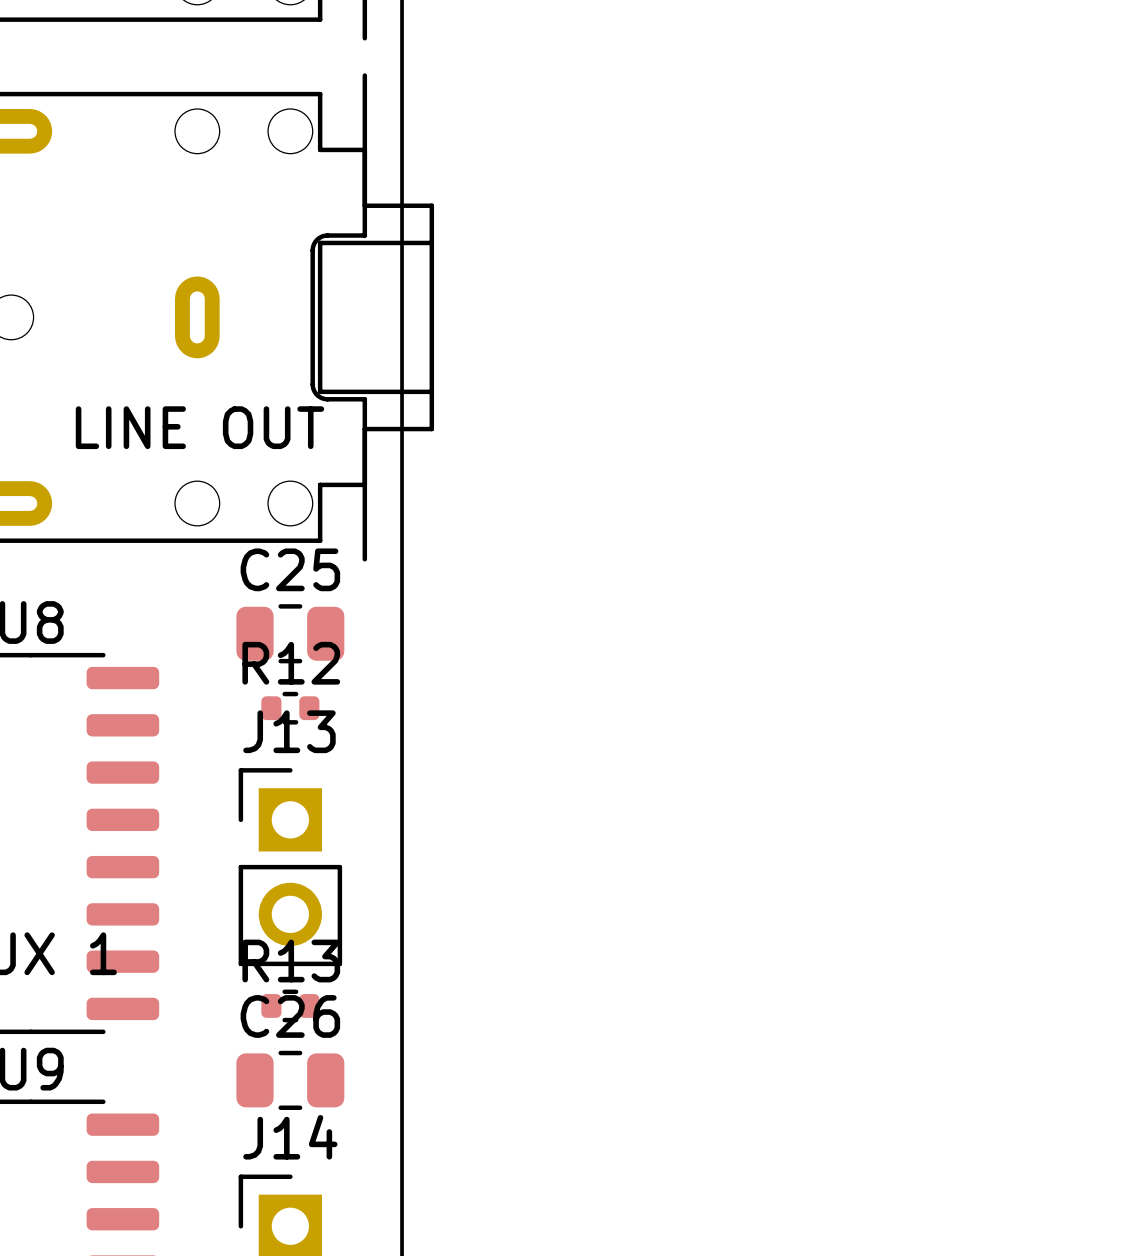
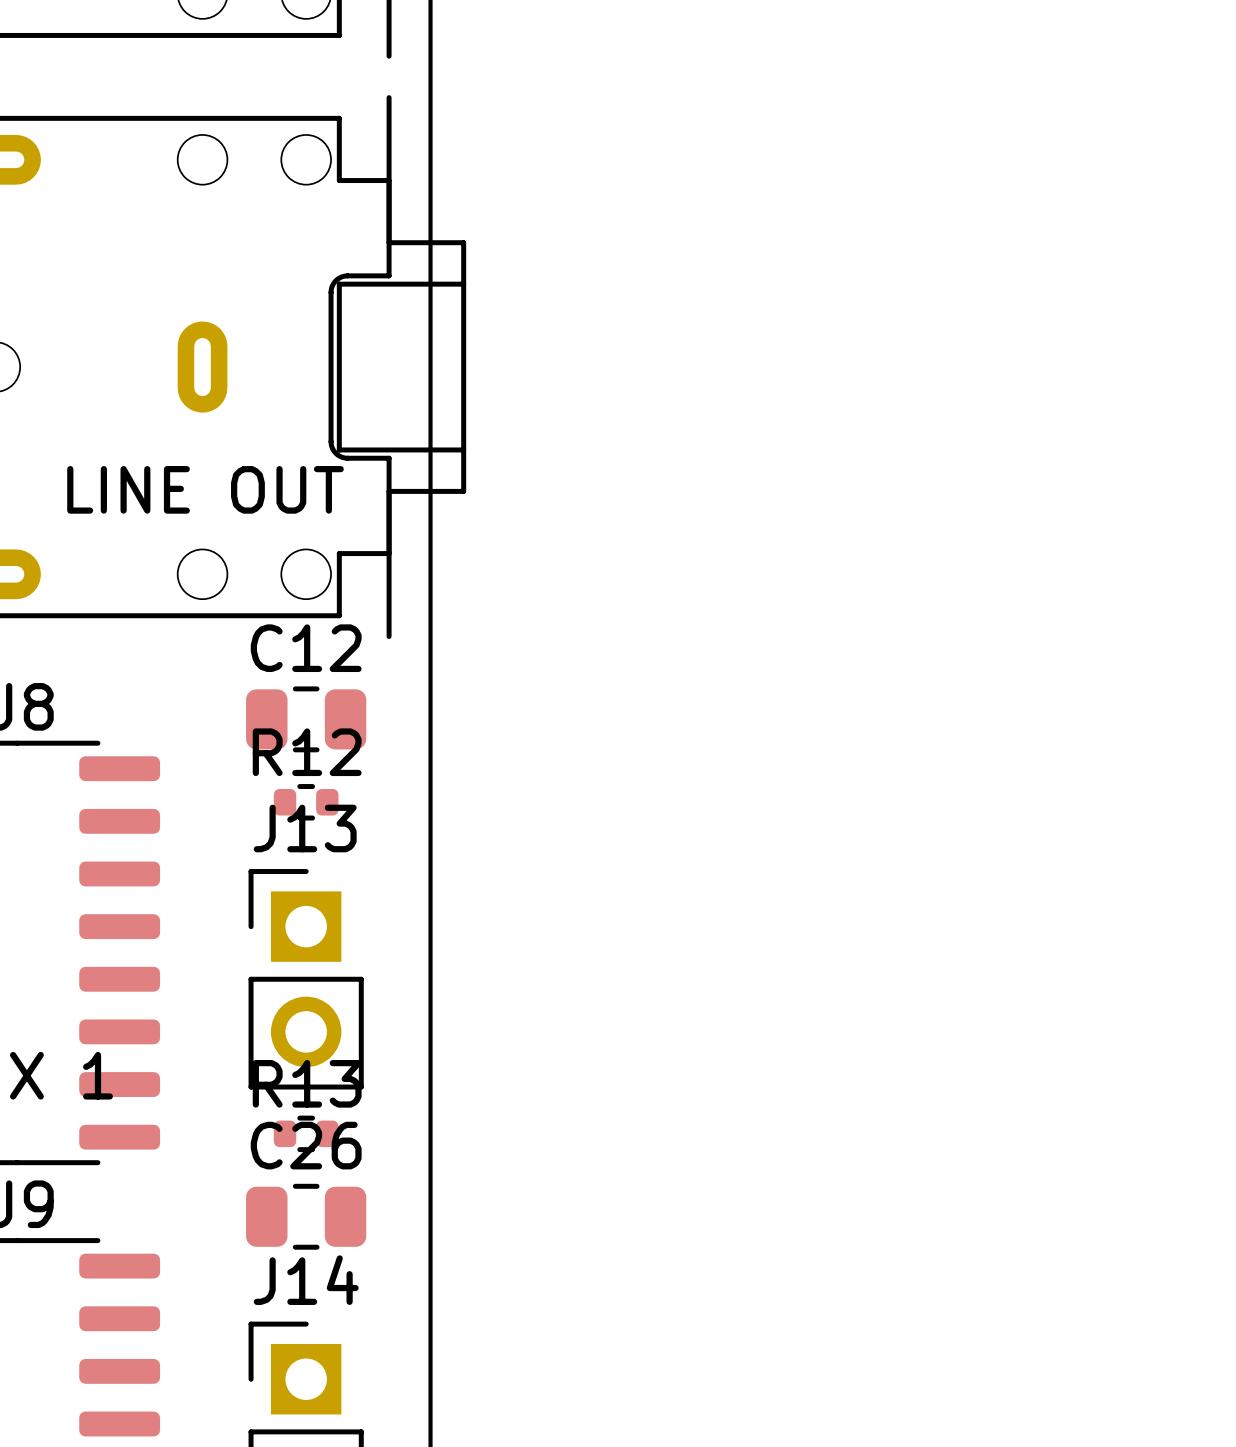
C25 name: C25 (290, 569) -> C12 (306, 648)

